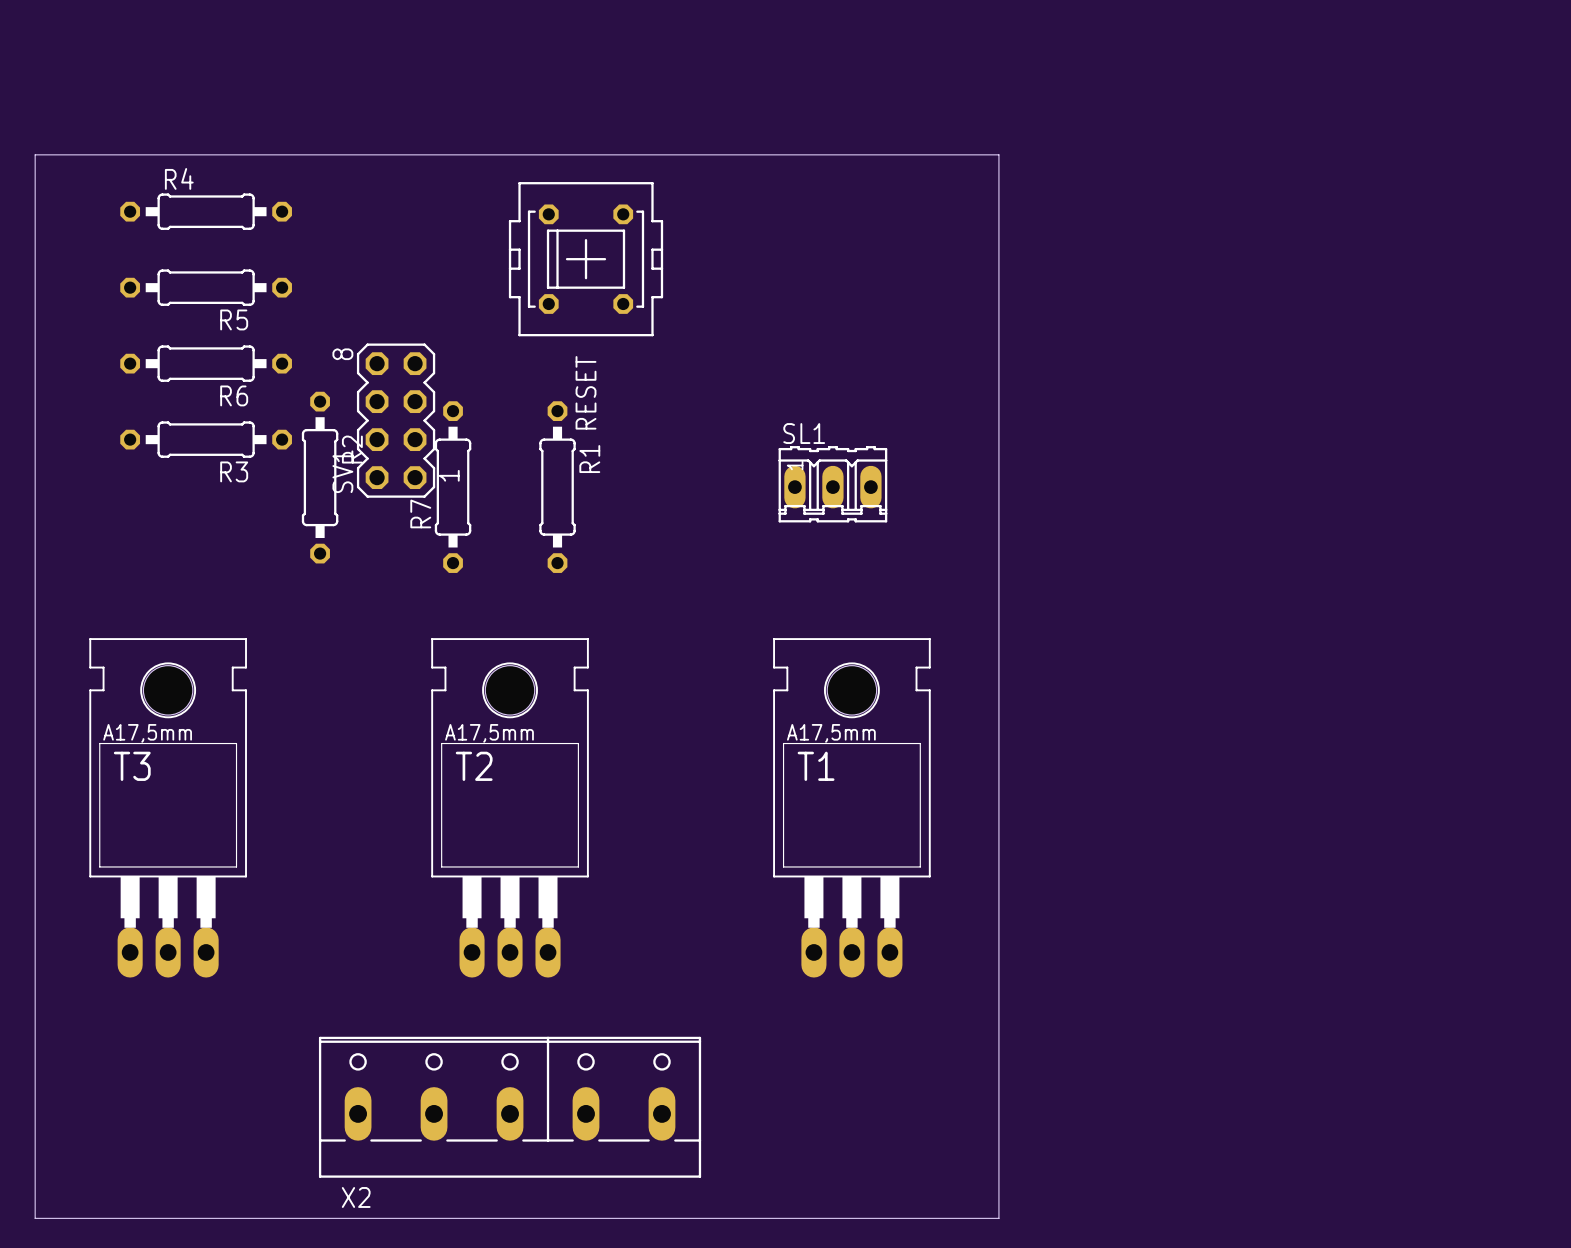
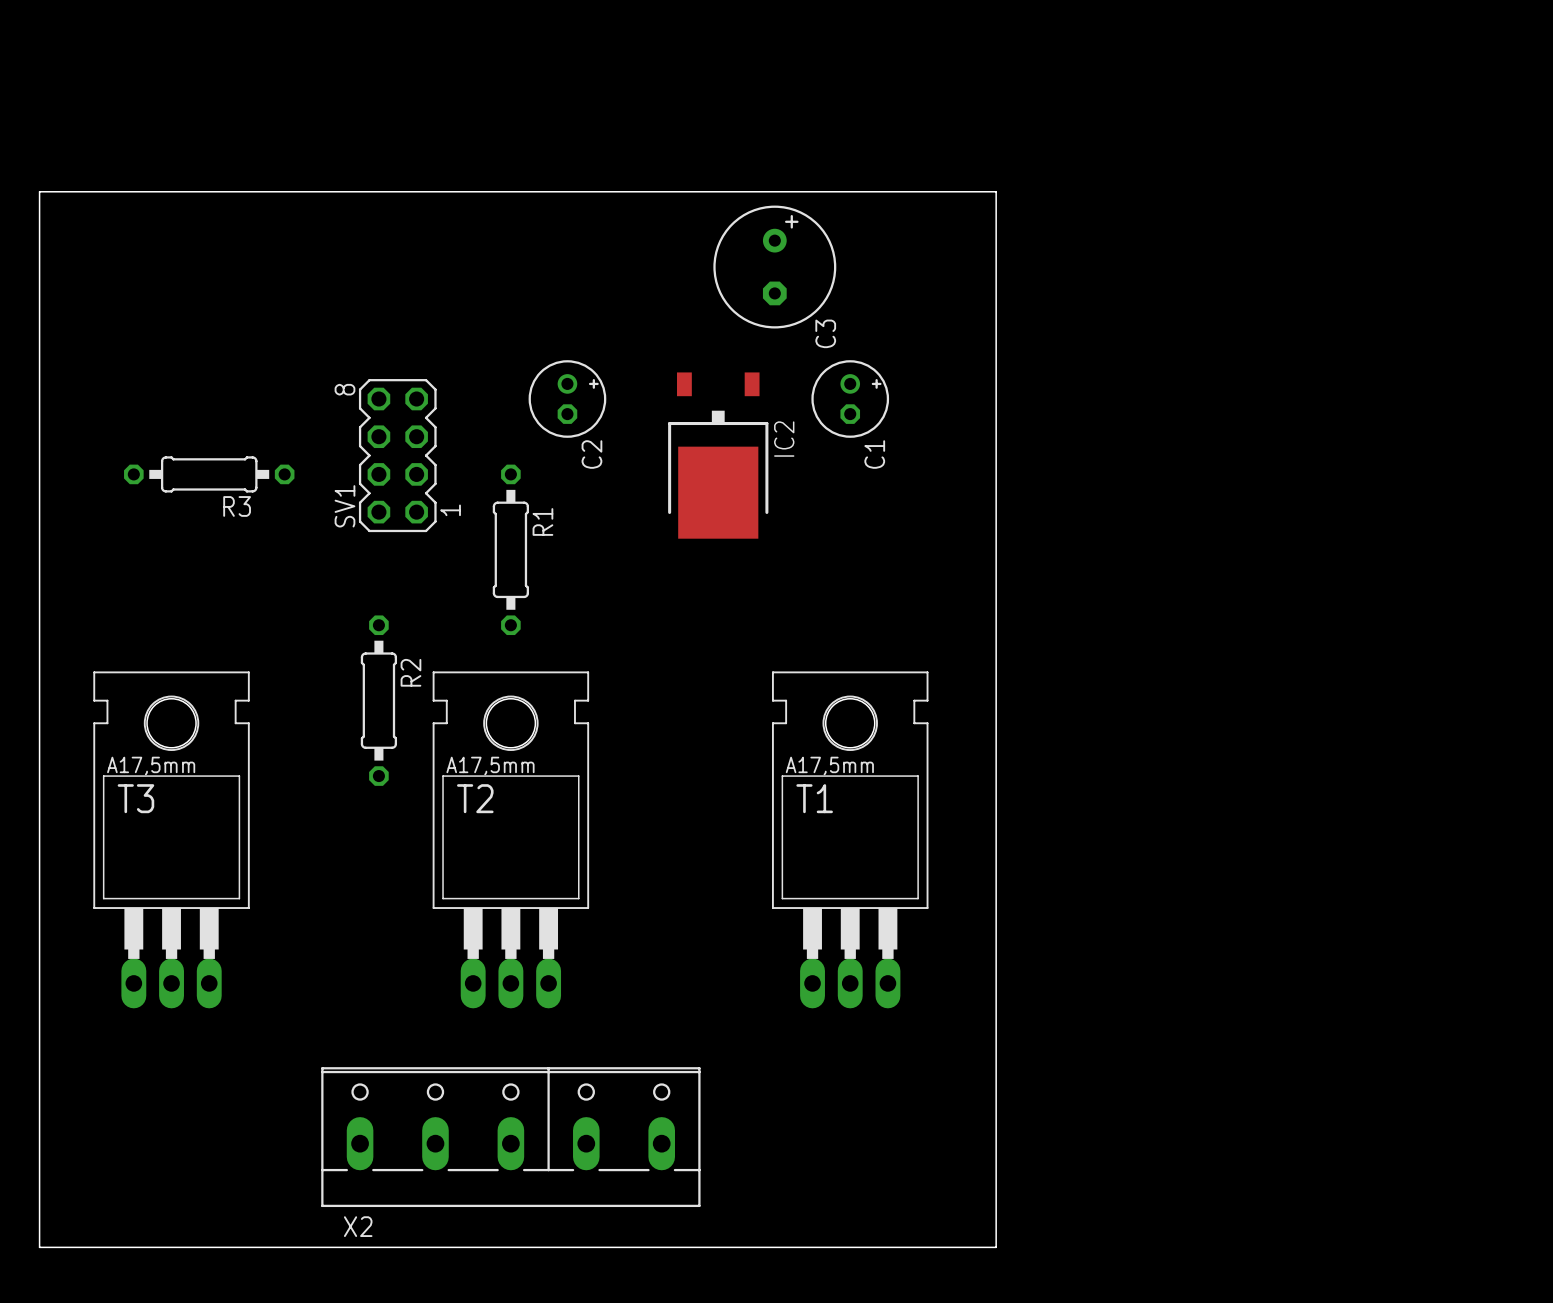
R4: (206, 211) -> none
C3: none -> (774, 267)
RESET: (586, 259) -> none
R5: (206, 287) -> none
R6: (206, 363) -> none
C2: none -> (567, 399)
C1: none -> (850, 399)
IC2: none -> (718, 455)
R2 position: (320, 477) -> (378, 700)
SL1: (832, 484) -> none
R7: (453, 487) -> none
R1 position: (557, 487) -> (510, 549)

